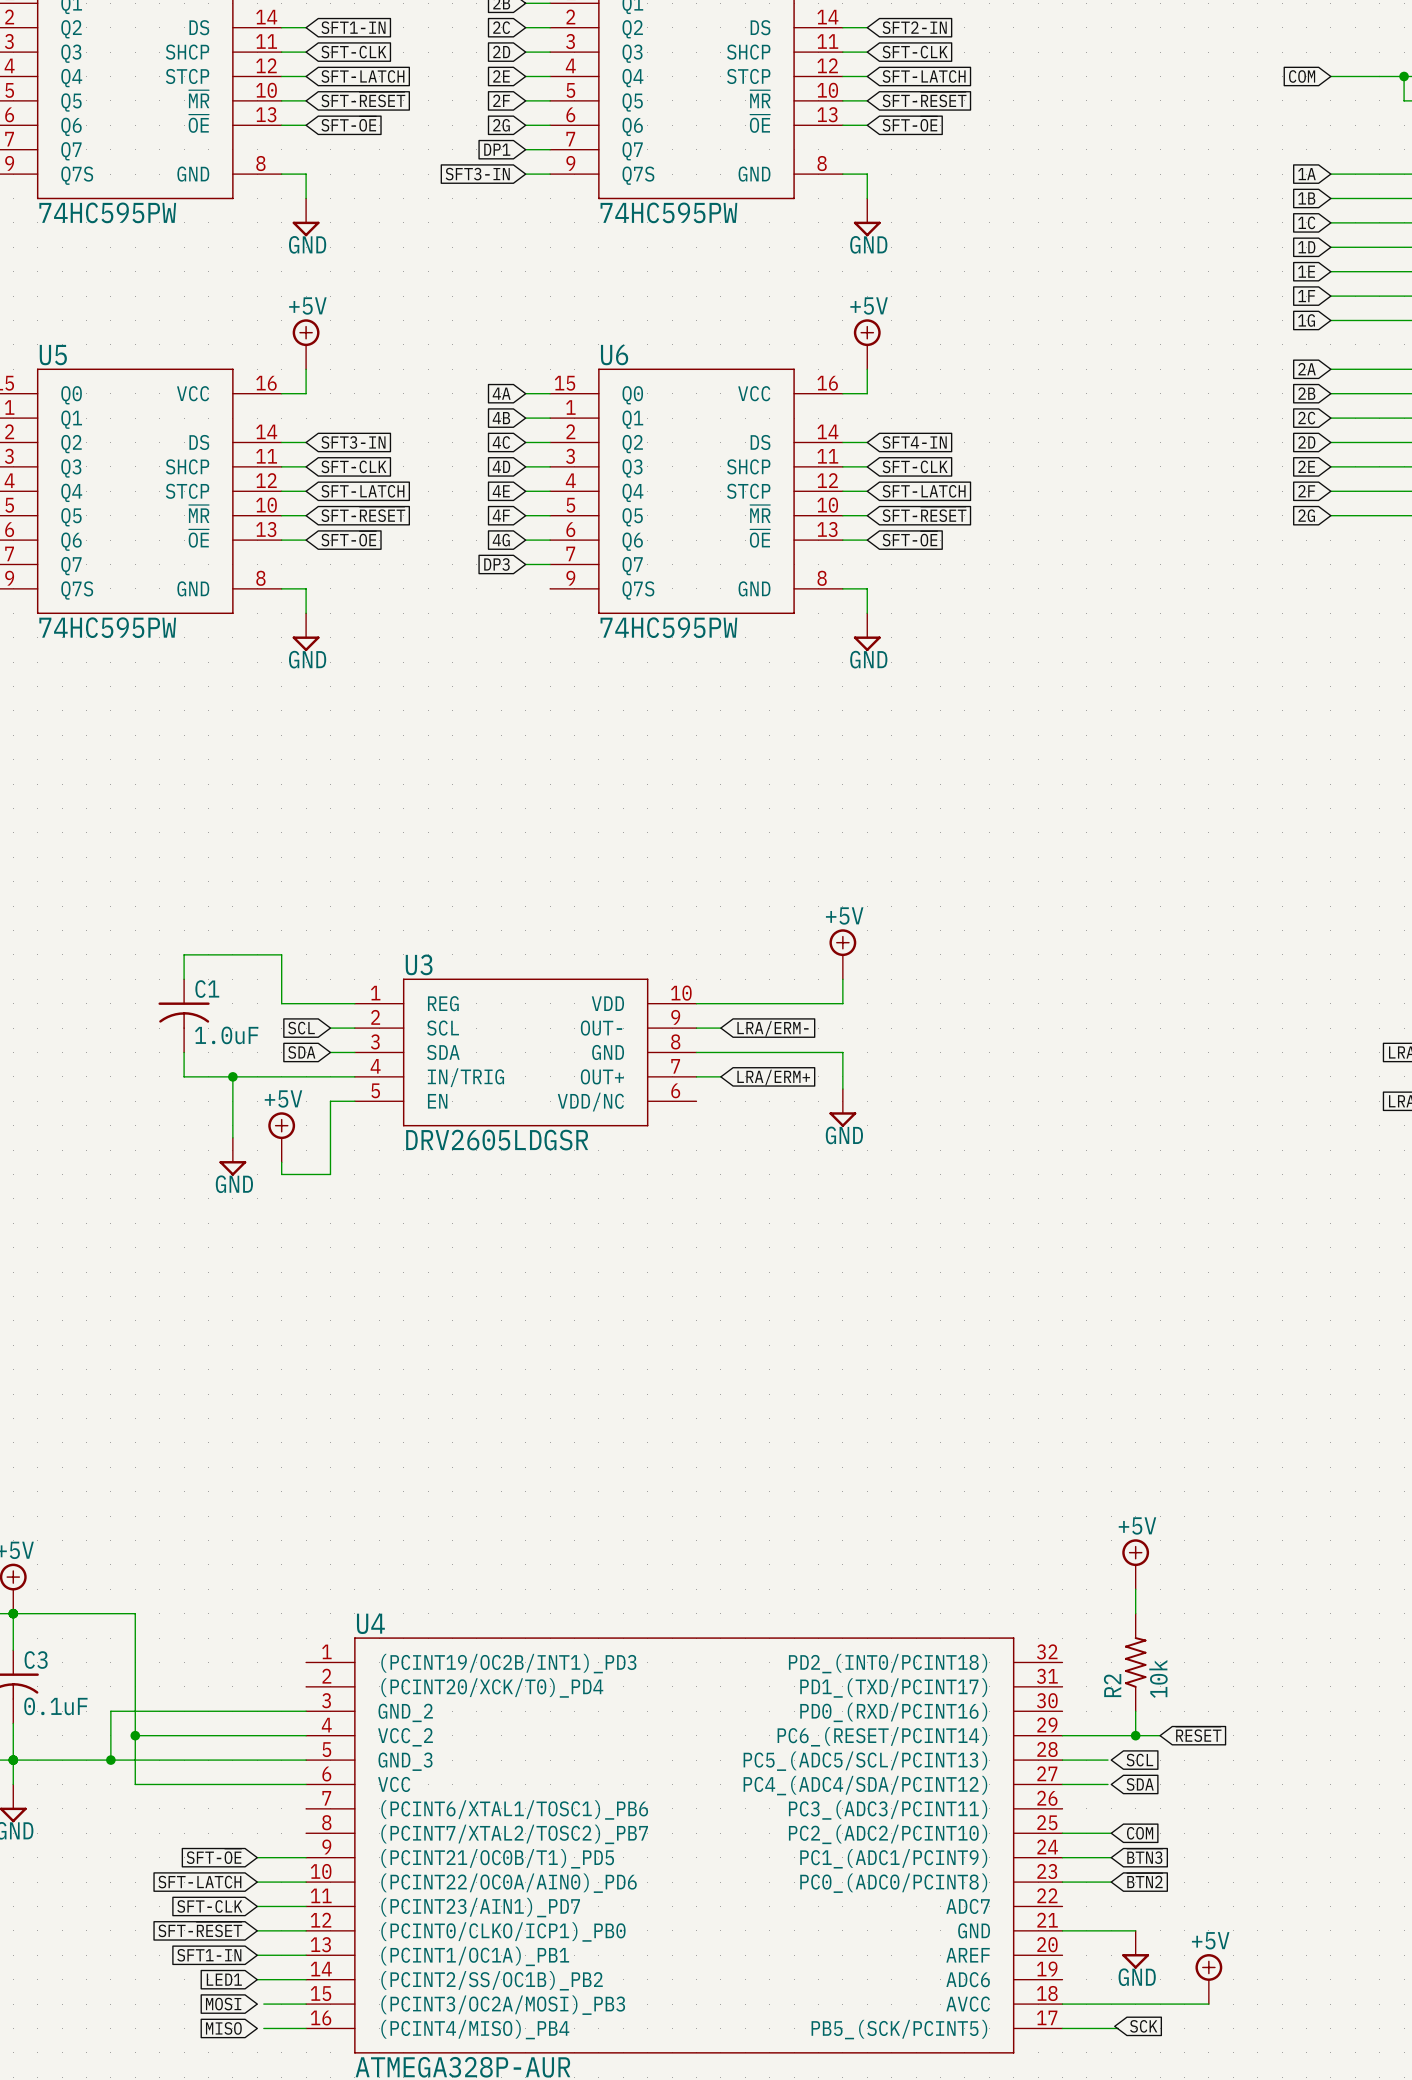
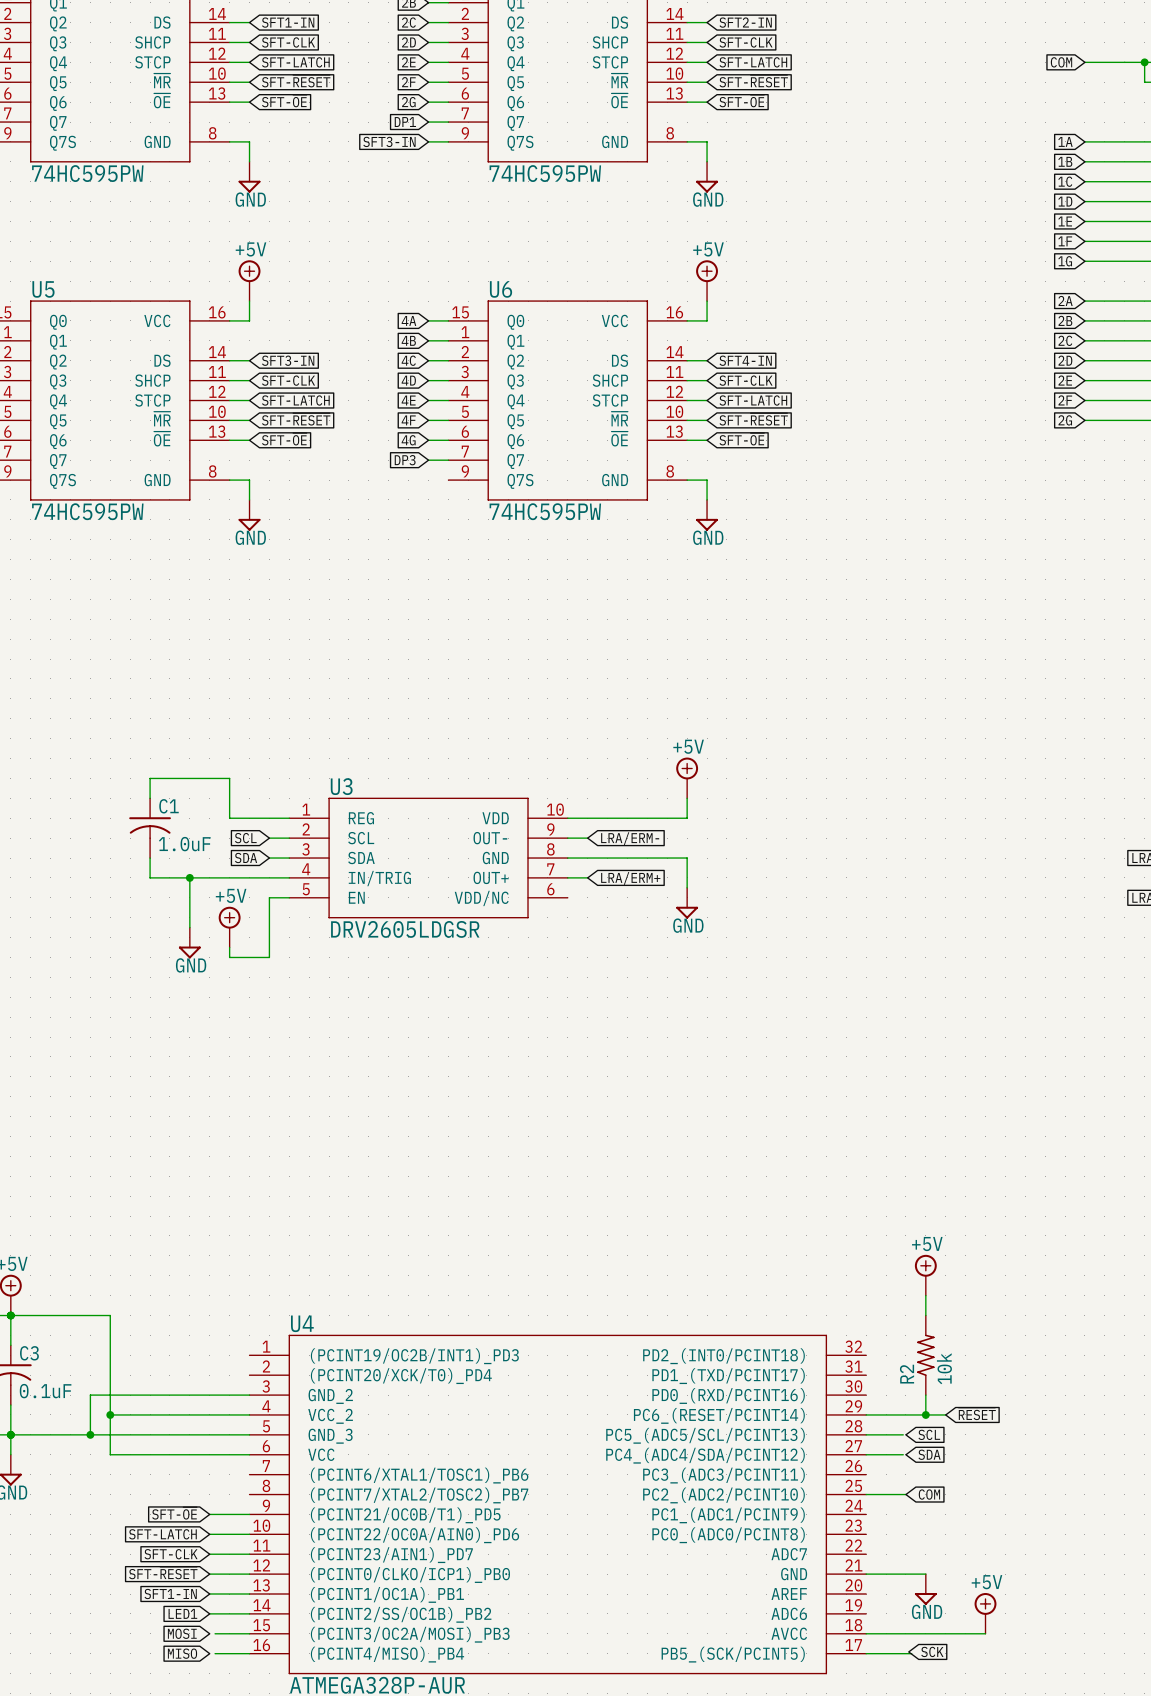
global label: ~{BTN3} (1144, 1856) -> none
wire: (1062, 1857) (1111, 1857) -> none
global label: ~{BTN2} (1144, 1880) -> none
wire: (1062, 1882) (1111, 1882) -> none

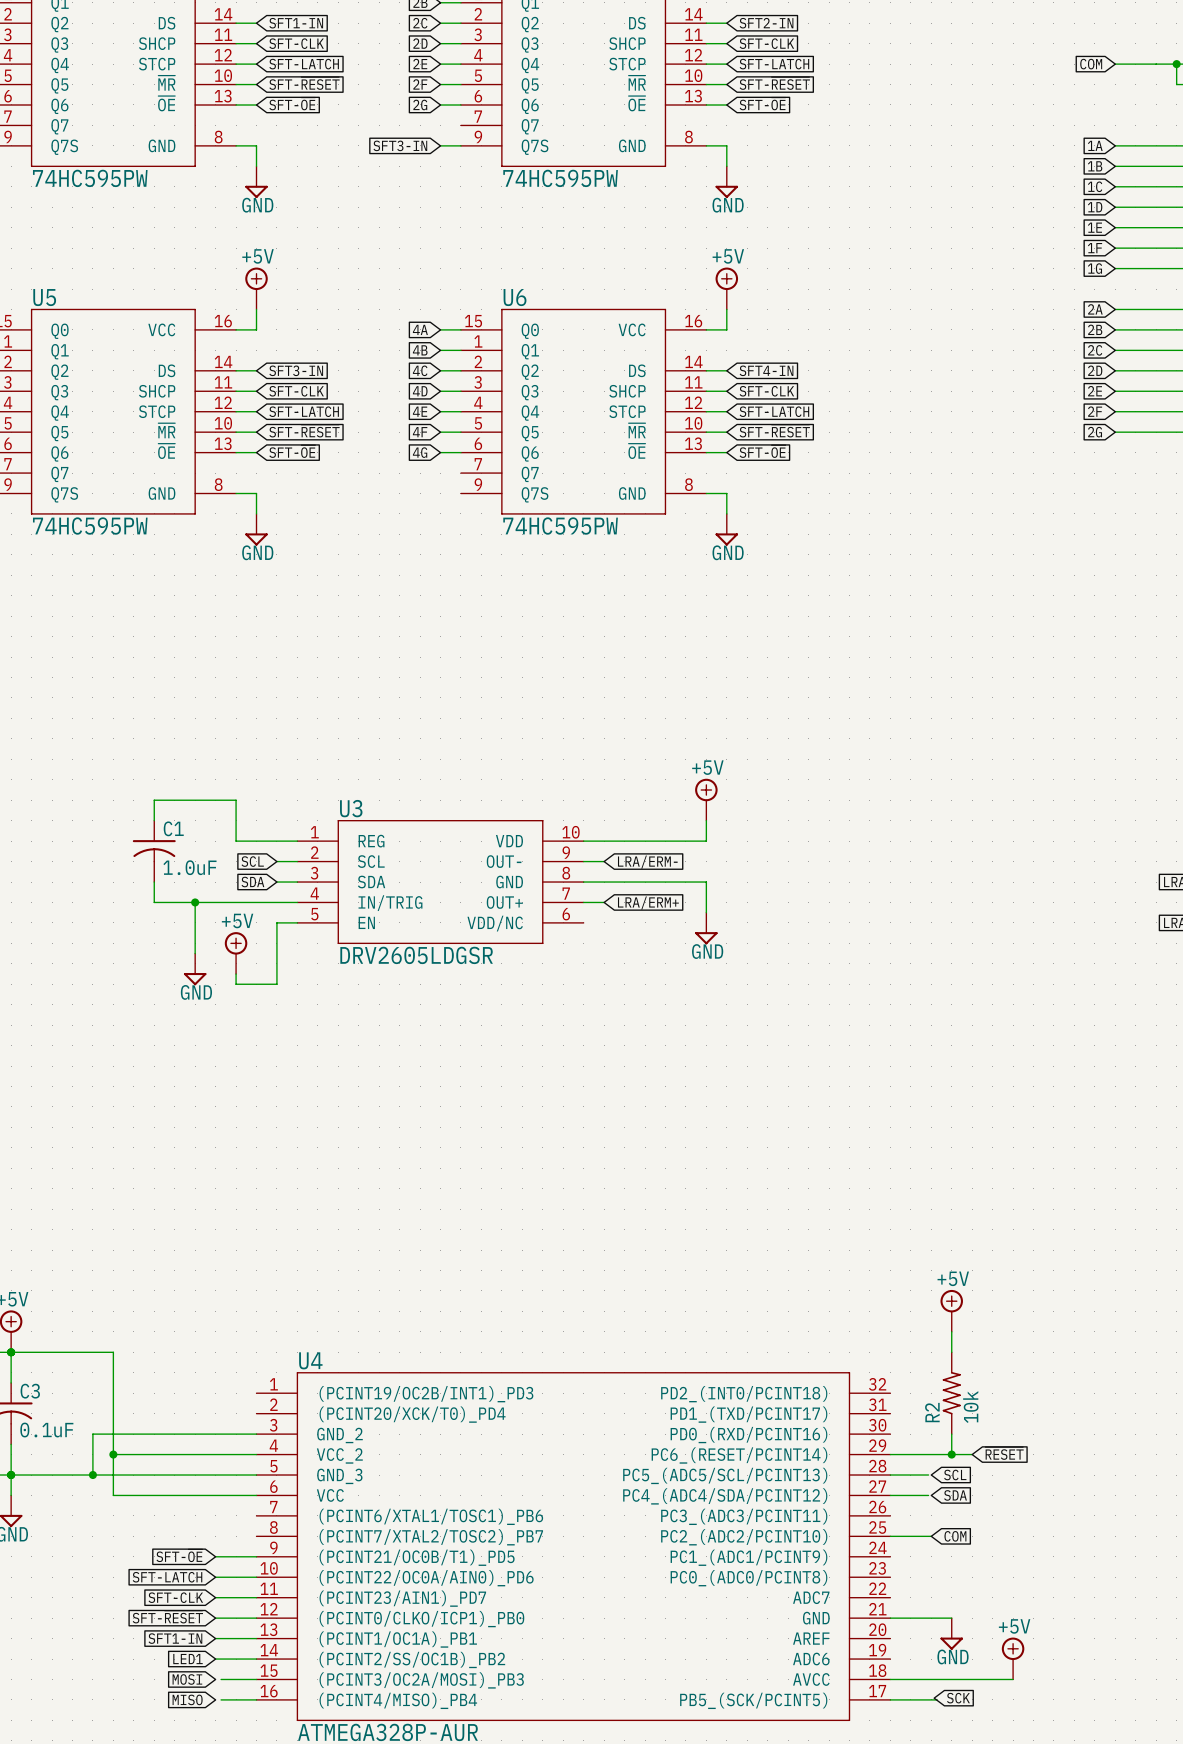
global label: DP1 (405, 122) -> none
wire: (428, 122) (448, 122) -> none
global label: DP3 (405, 460) -> none
wire: (428, 460) (448, 460) -> none

